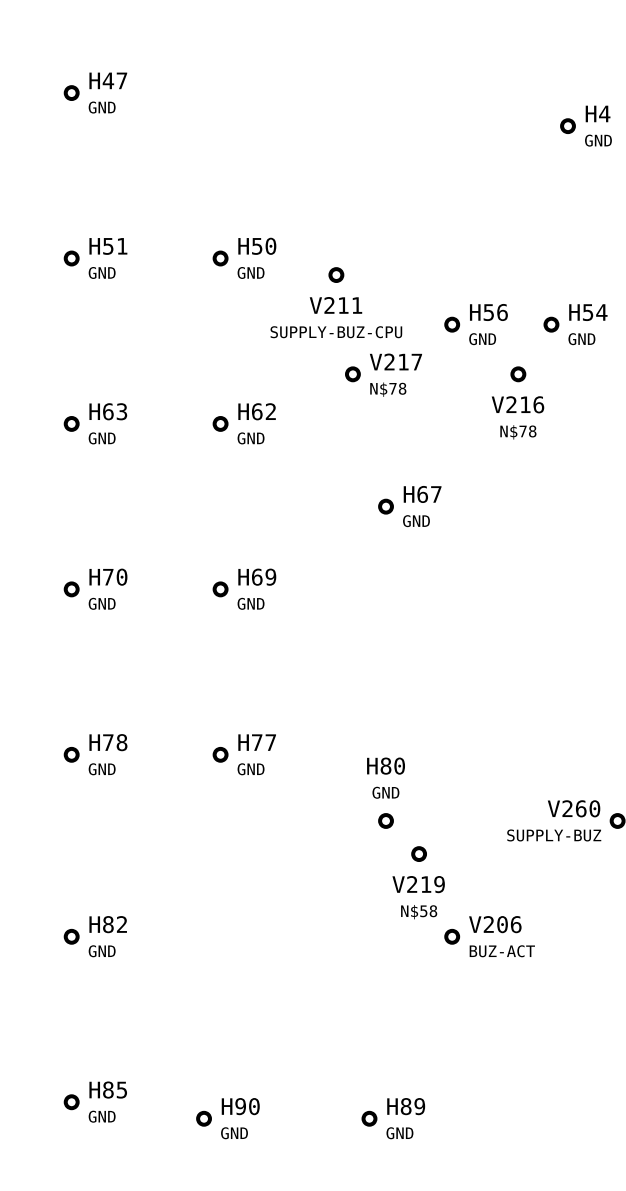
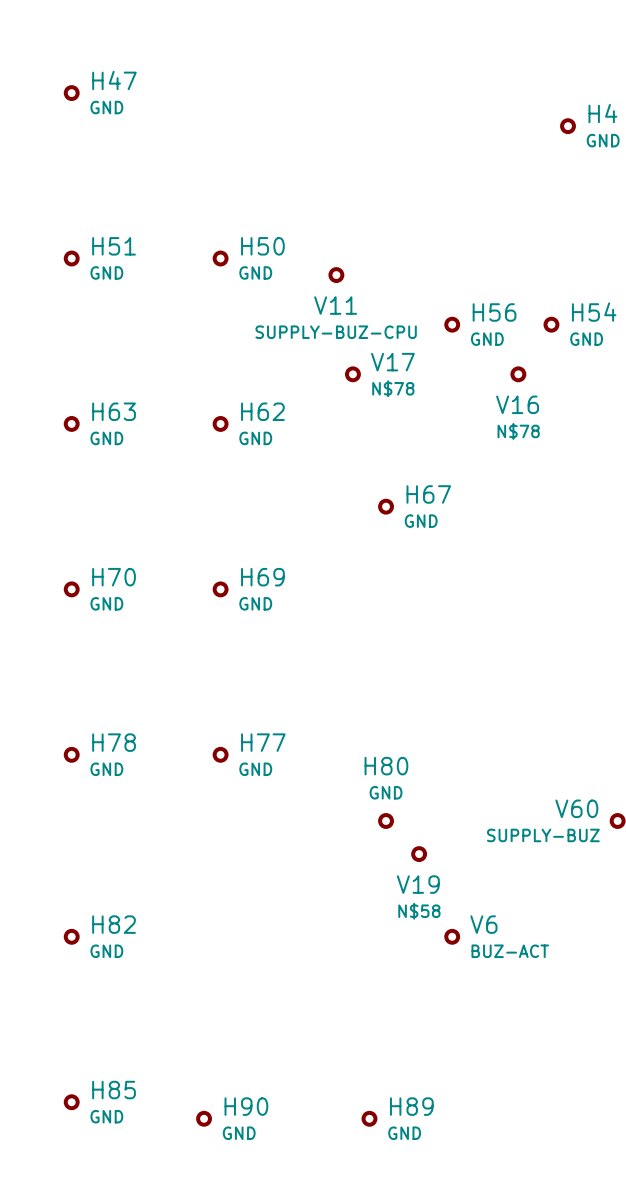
V211 name: V211 (335, 305) -> V11 (335, 305)
V217 name: V217 (395, 361) -> V17 (392, 362)
V216 name: V216 (517, 404) -> V16 (517, 404)
V260 name: V260 (574, 808) -> V60 (576, 808)
V219 name: V219 (418, 884) -> V19 (418, 884)
V206 name: V206 (495, 924) -> V6 (483, 924)

